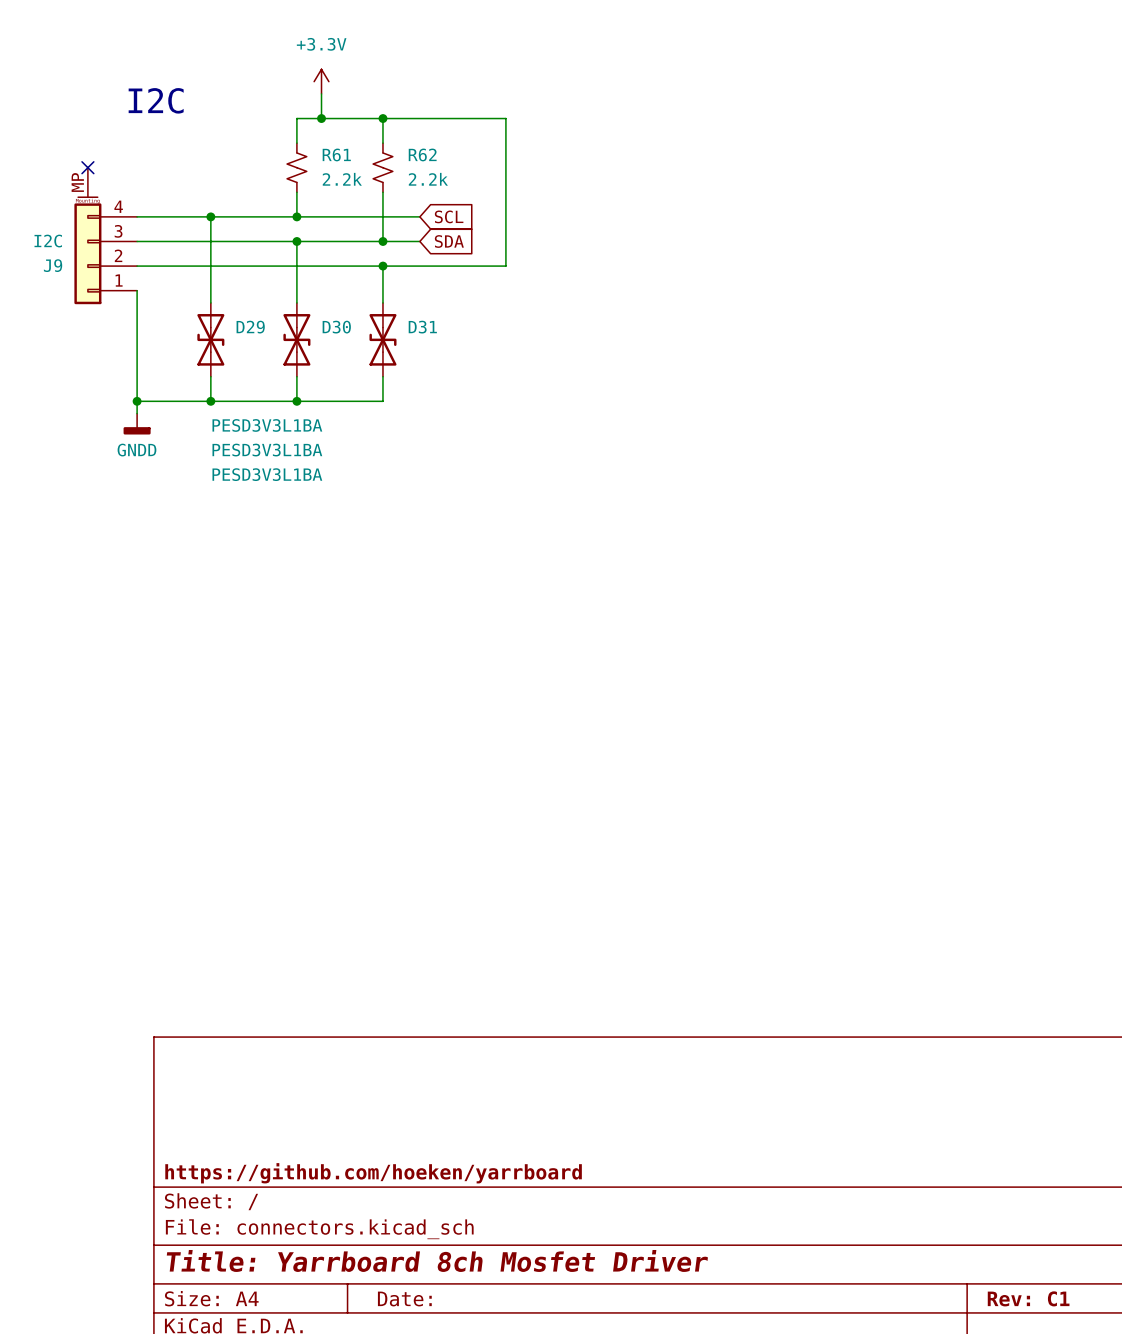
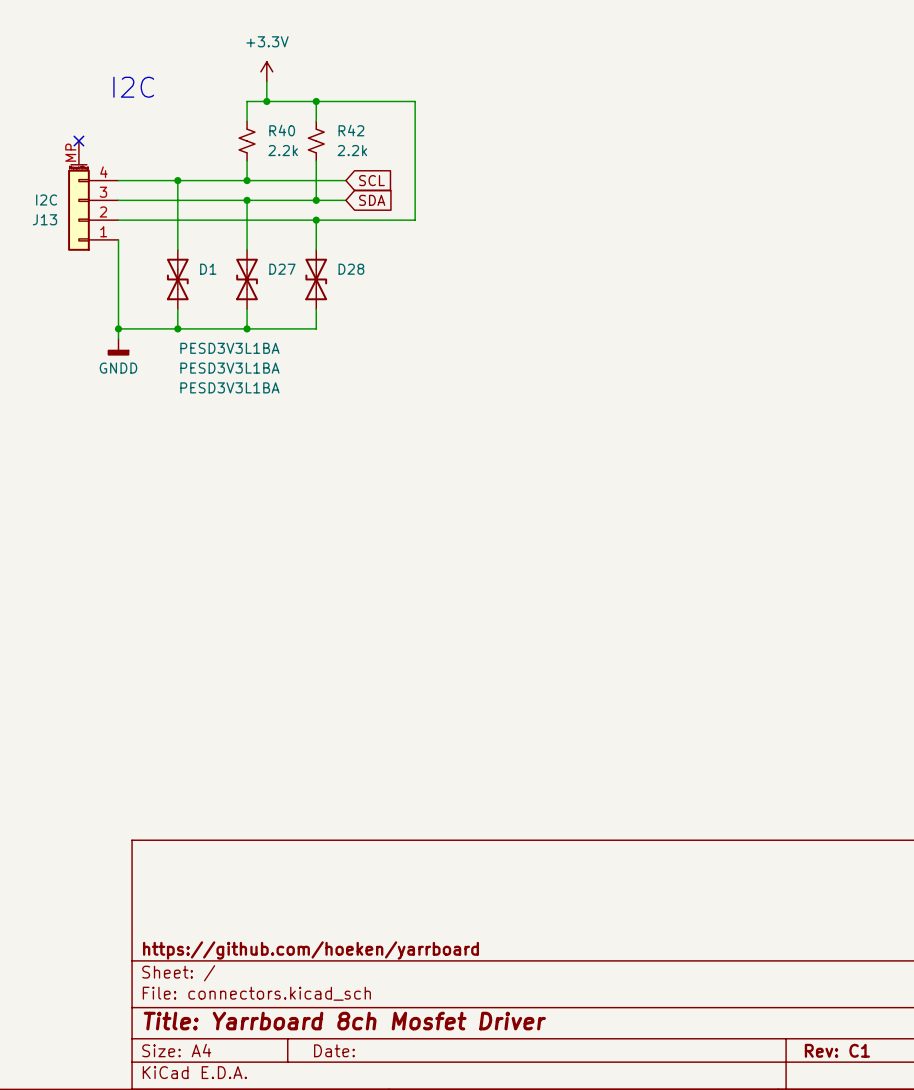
R61 name: R61 (336, 154) -> R40 (282, 130)
R62 name: R62 (422, 154) -> R42 (351, 130)
J9 name: J9 (53, 265) -> J13 (44, 219)
D29 name: D29 (250, 327) -> D1 (208, 269)
D30 name: D30 (336, 327) -> D27 (282, 269)
D31 name: D31 (422, 327) -> D28 (351, 269)

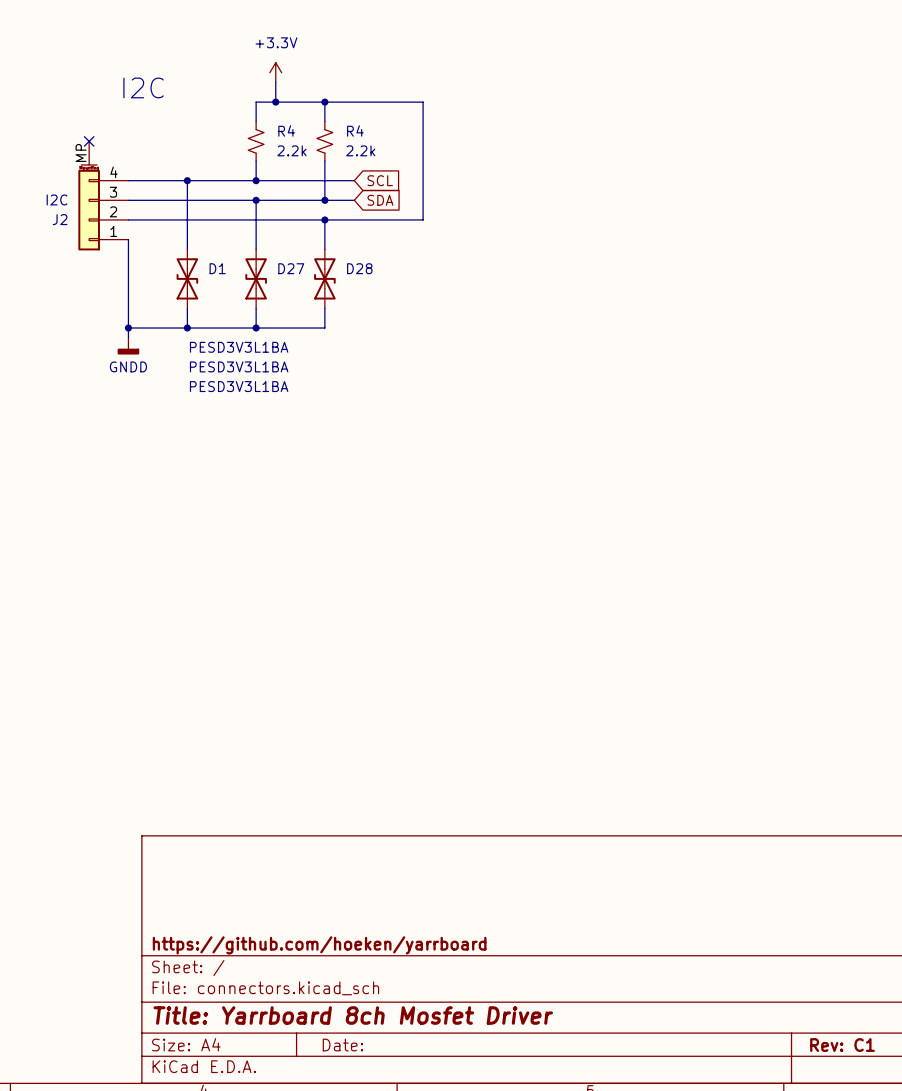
R40 name: R40 (282, 130) -> R4 (286, 130)
R42 name: R42 (351, 130) -> R4 (355, 130)
J13 name: J13 (44, 219) -> J2 (60, 219)

